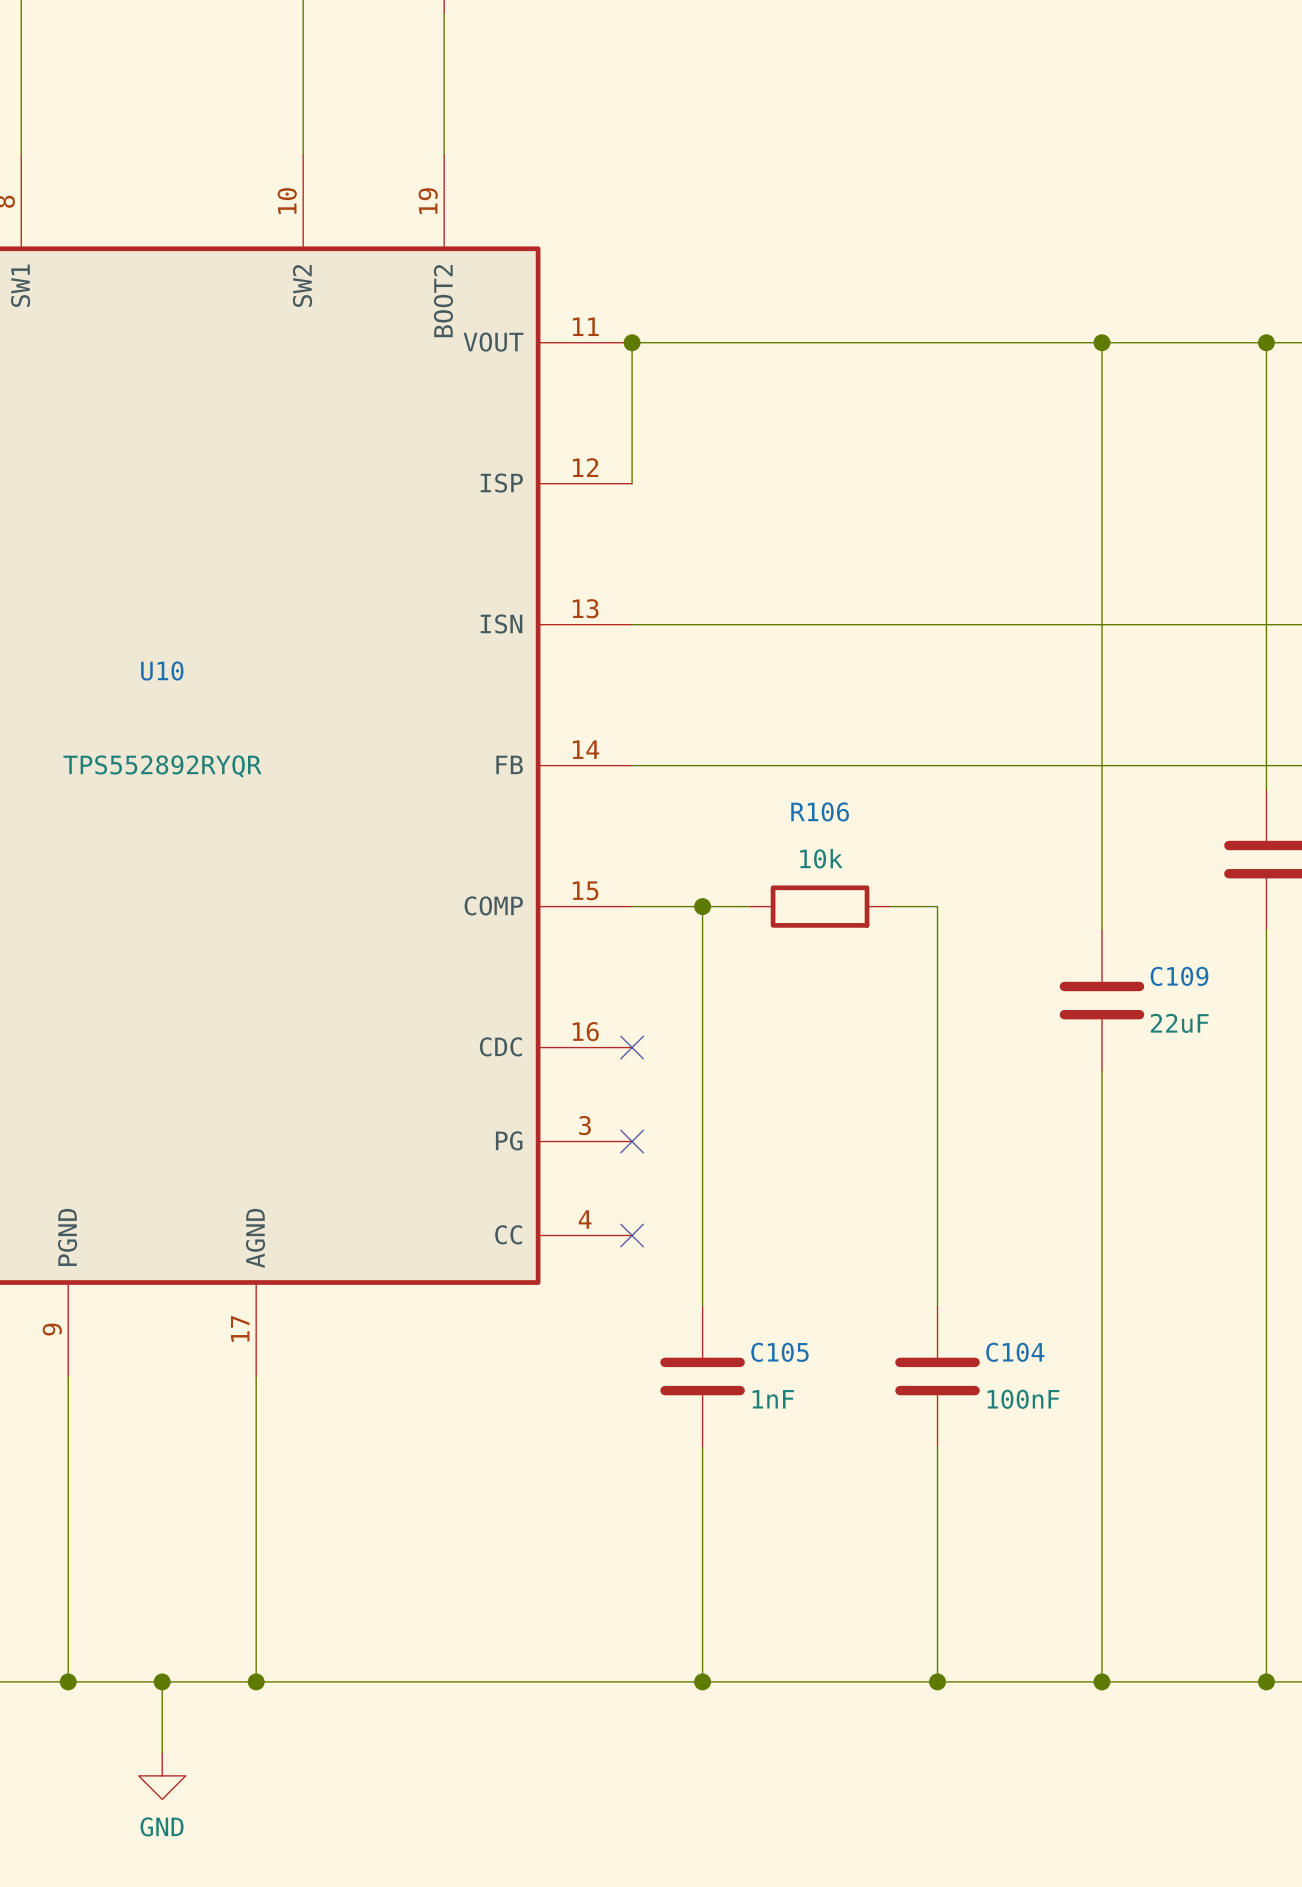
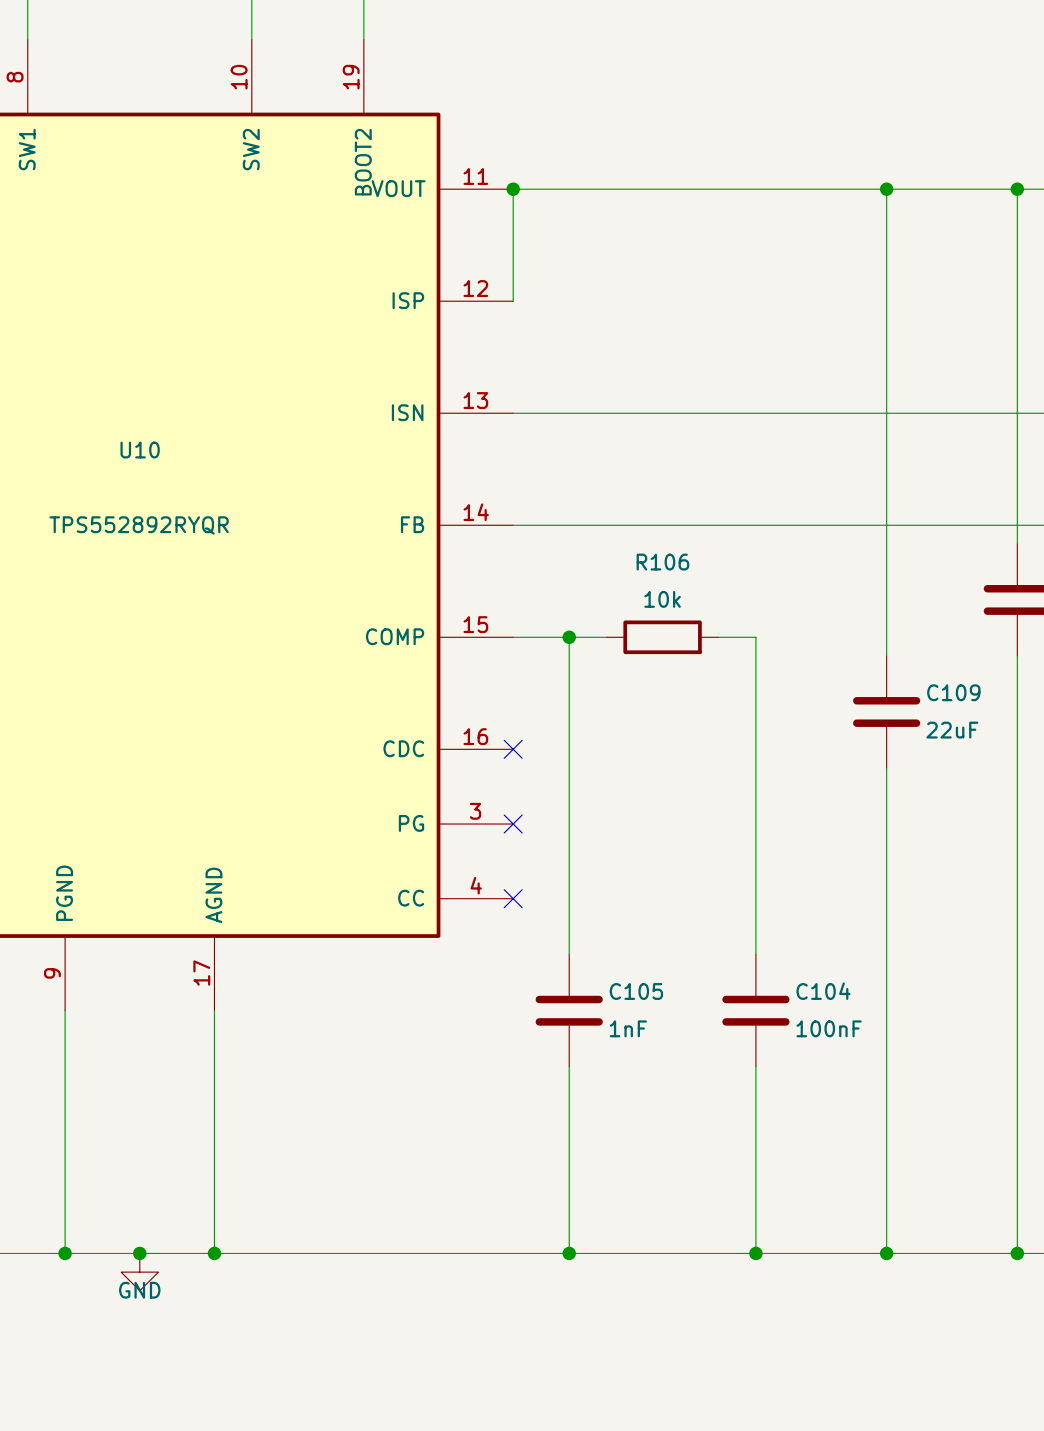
wire: (162, 1681) (162, 1752) -> none
power symbol position: GND (162, 1775) -> GND (139, 1272)
power symbol text position: GND (162, 1826) -> GND (139, 1290)

